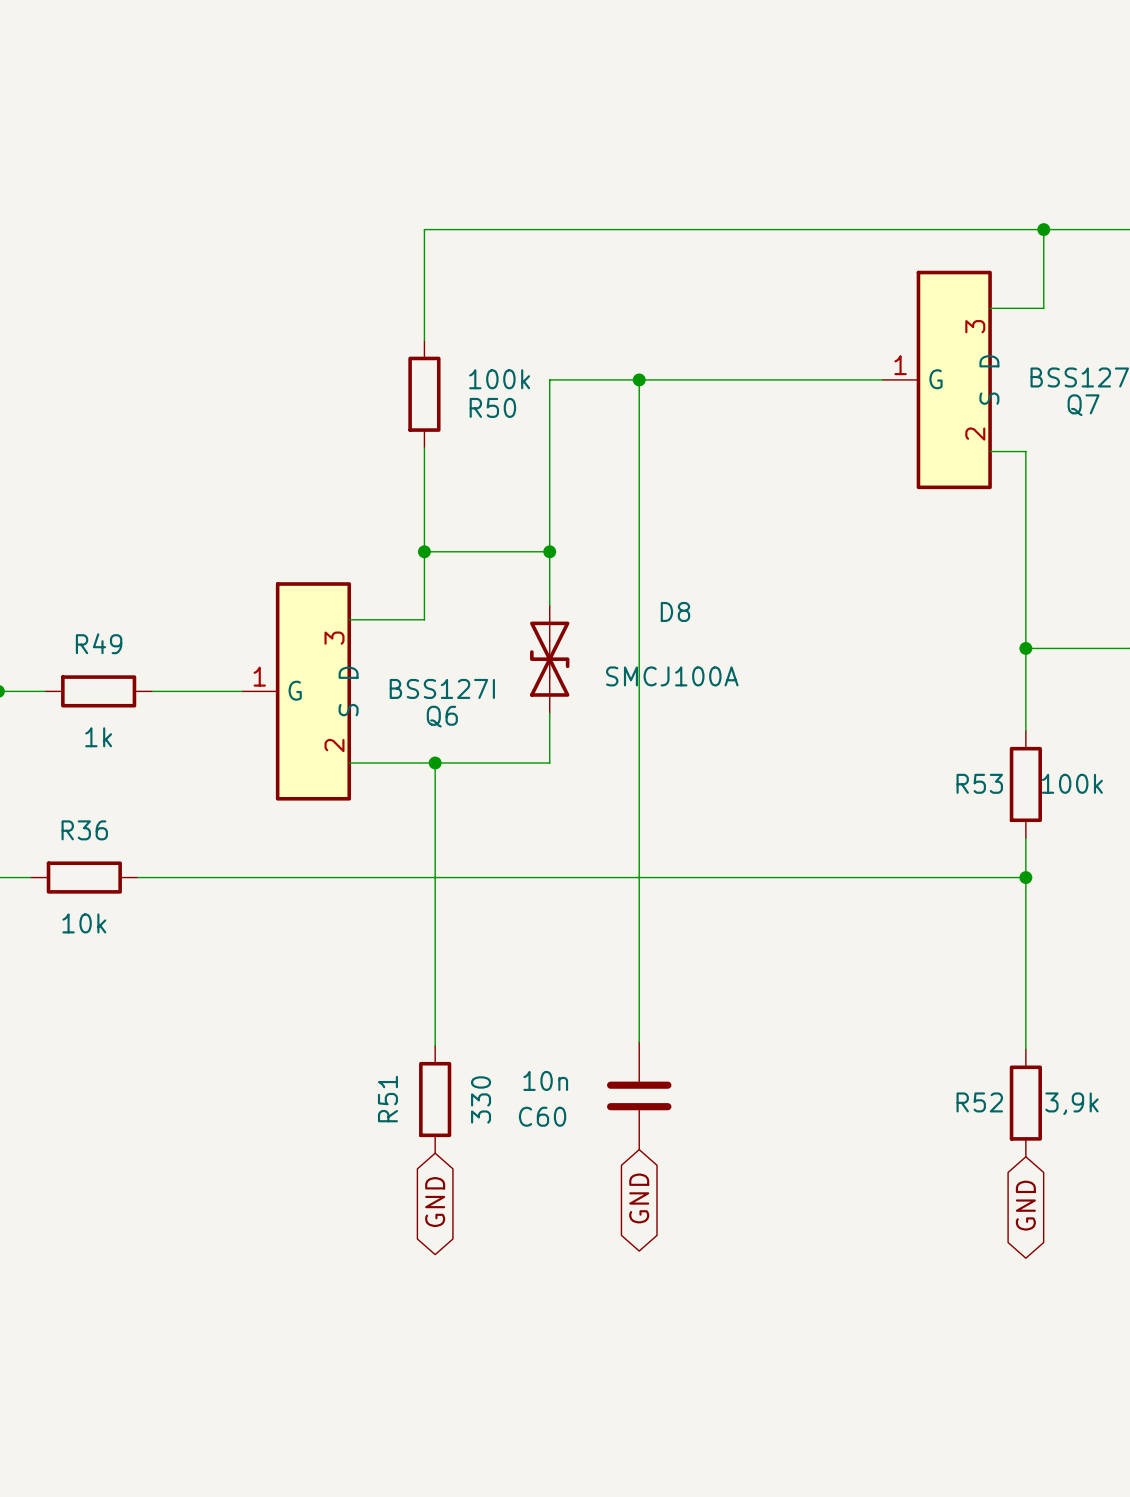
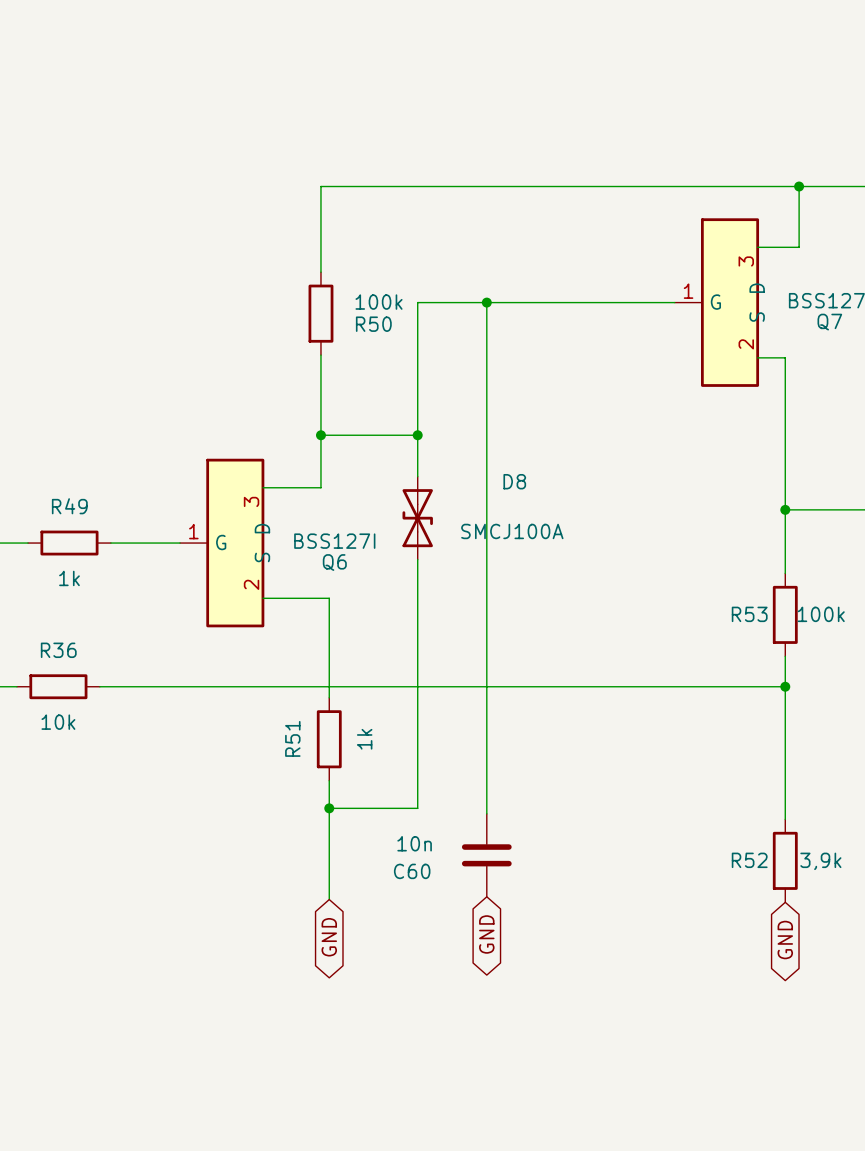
wire: (435, 763) (549, 763) -> (329, 808) (417, 808) (417, 598)
junction: (435, 763) -> none
wire: (435, 891) (435, 999) -> (329, 816) (329, 899)
junction: none -> (329, 808)
R51 position: (435, 1099) -> (329, 739)
R51 value: 330 (481, 1099) -> 1k (364, 739)

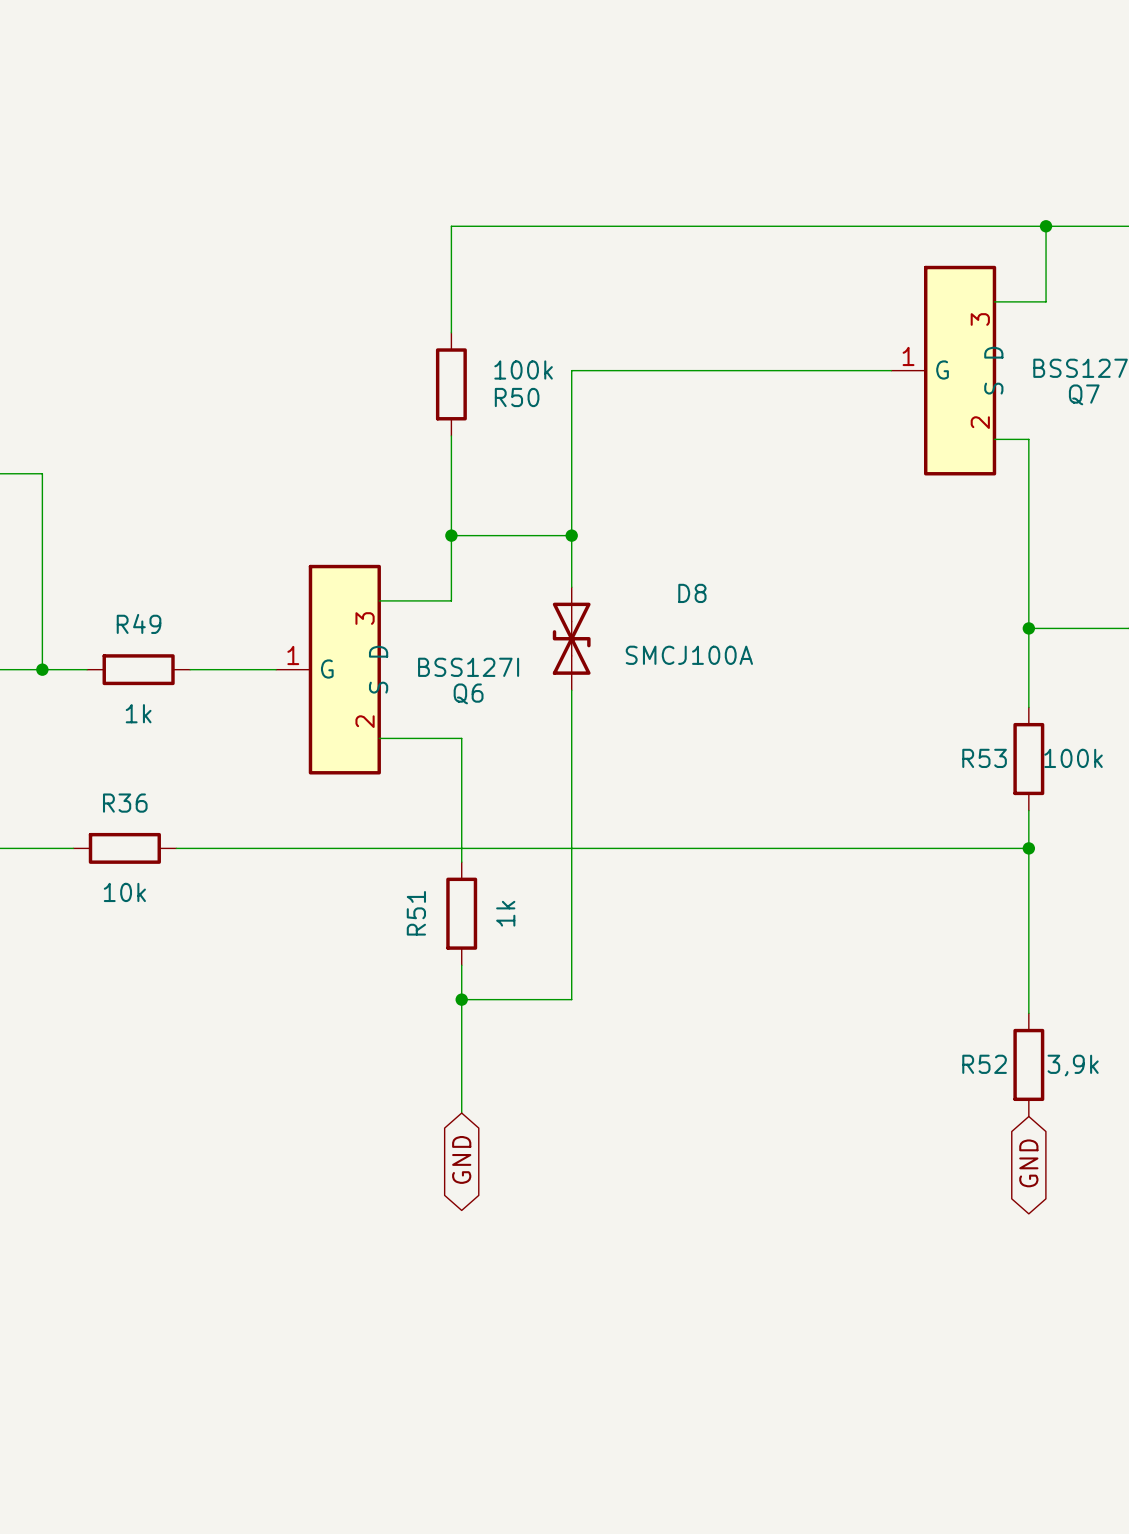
wire: (486, 302) (486, 813) -> none
junction: (486, 302) -> none
C60: 10n (486, 855) -> none
global label: GND (486, 934) -> none

